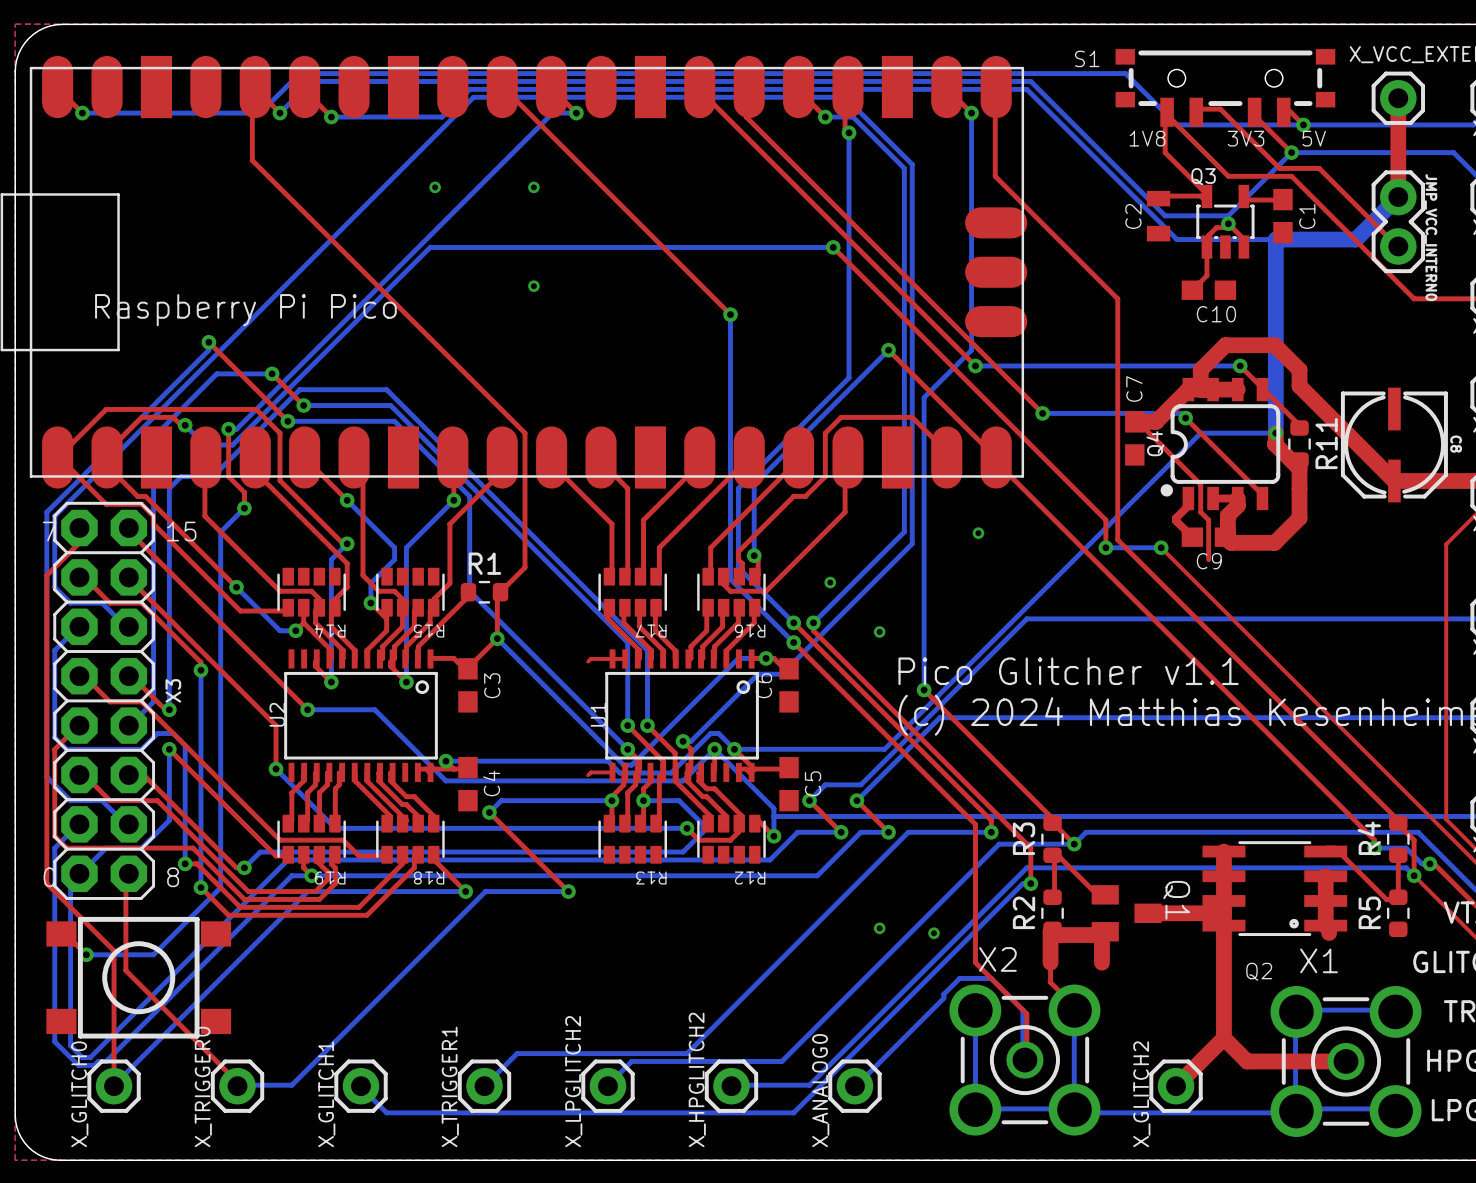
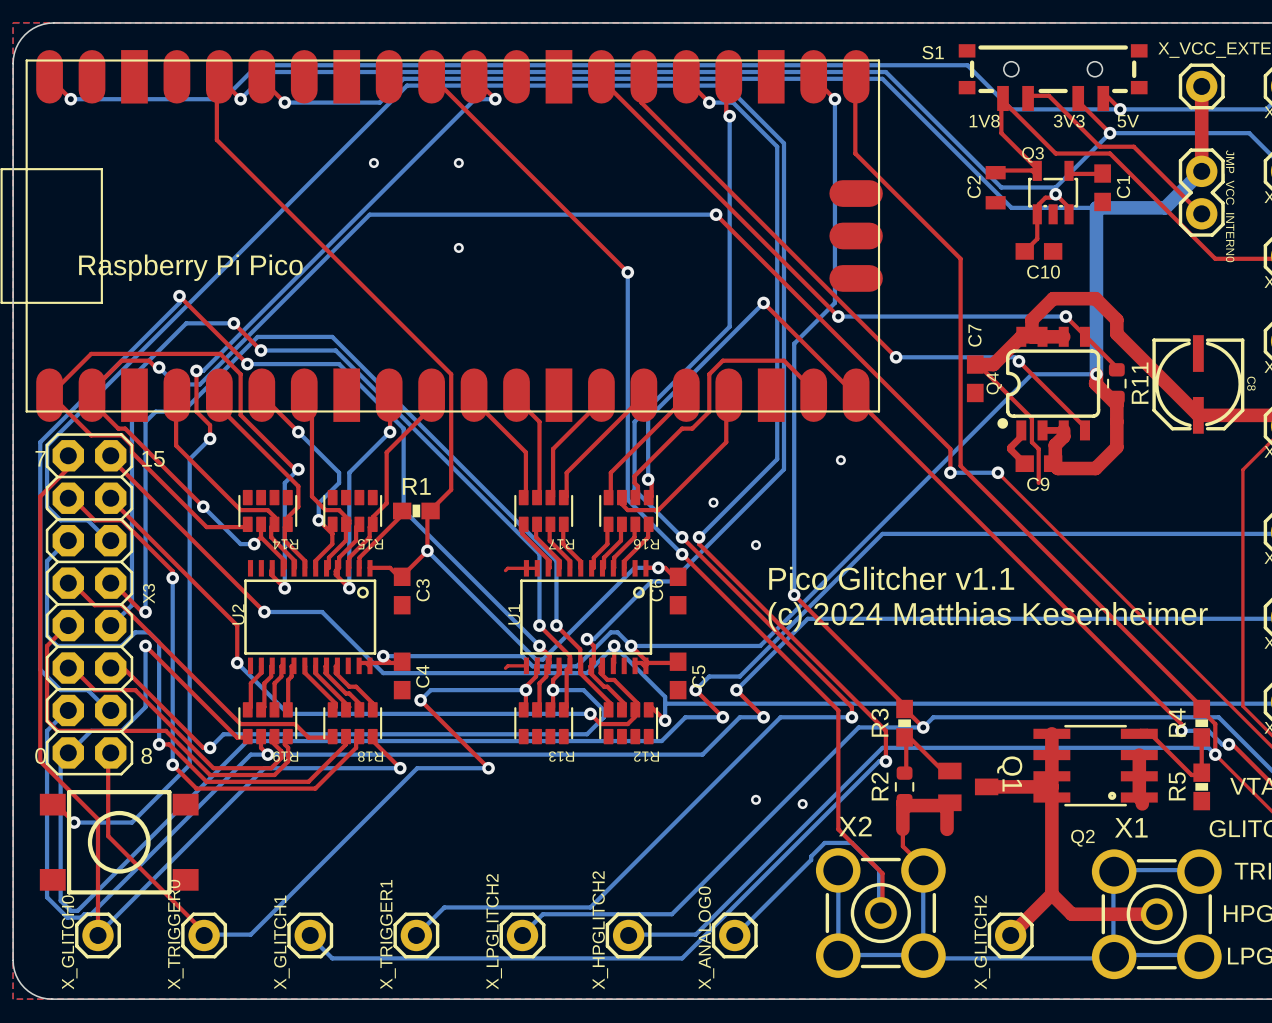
R1 footprint: [460, 580, 509, 604] -> [392, 502, 440, 520]
R3 footprint: [1041, 815, 1064, 864] -> [896, 699, 913, 747]
R4 footprint: [1386, 815, 1410, 864] -> [1193, 699, 1211, 747]
R5 footprint: [1386, 889, 1410, 938] -> [1193, 763, 1211, 811]

